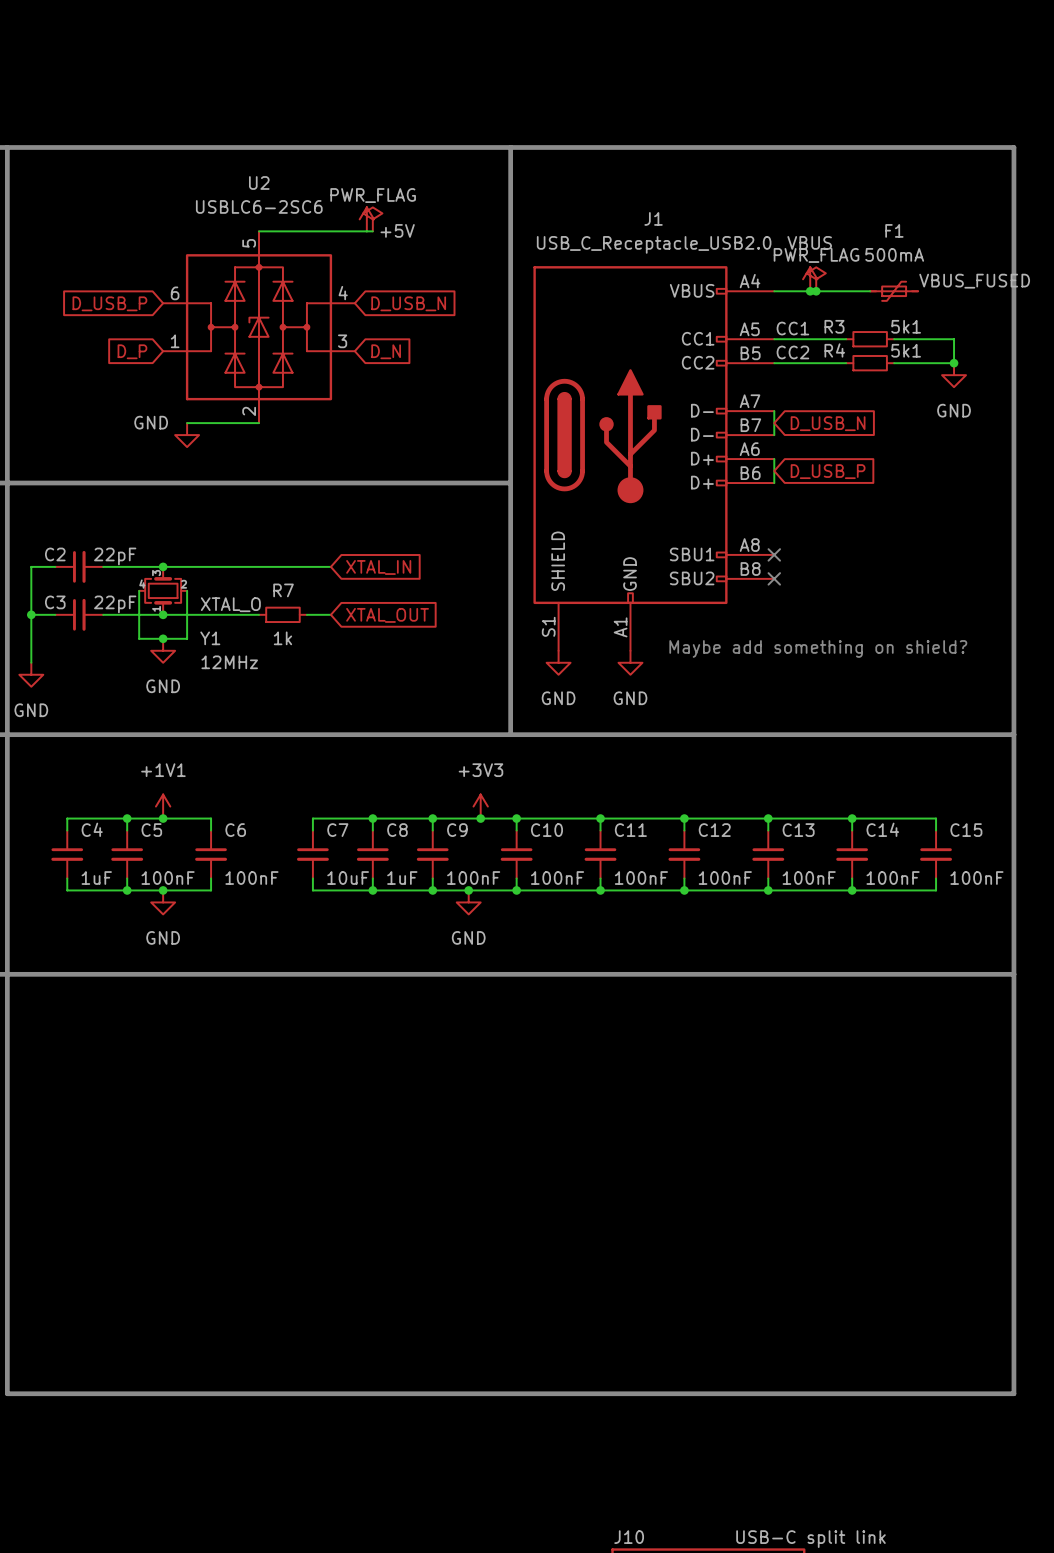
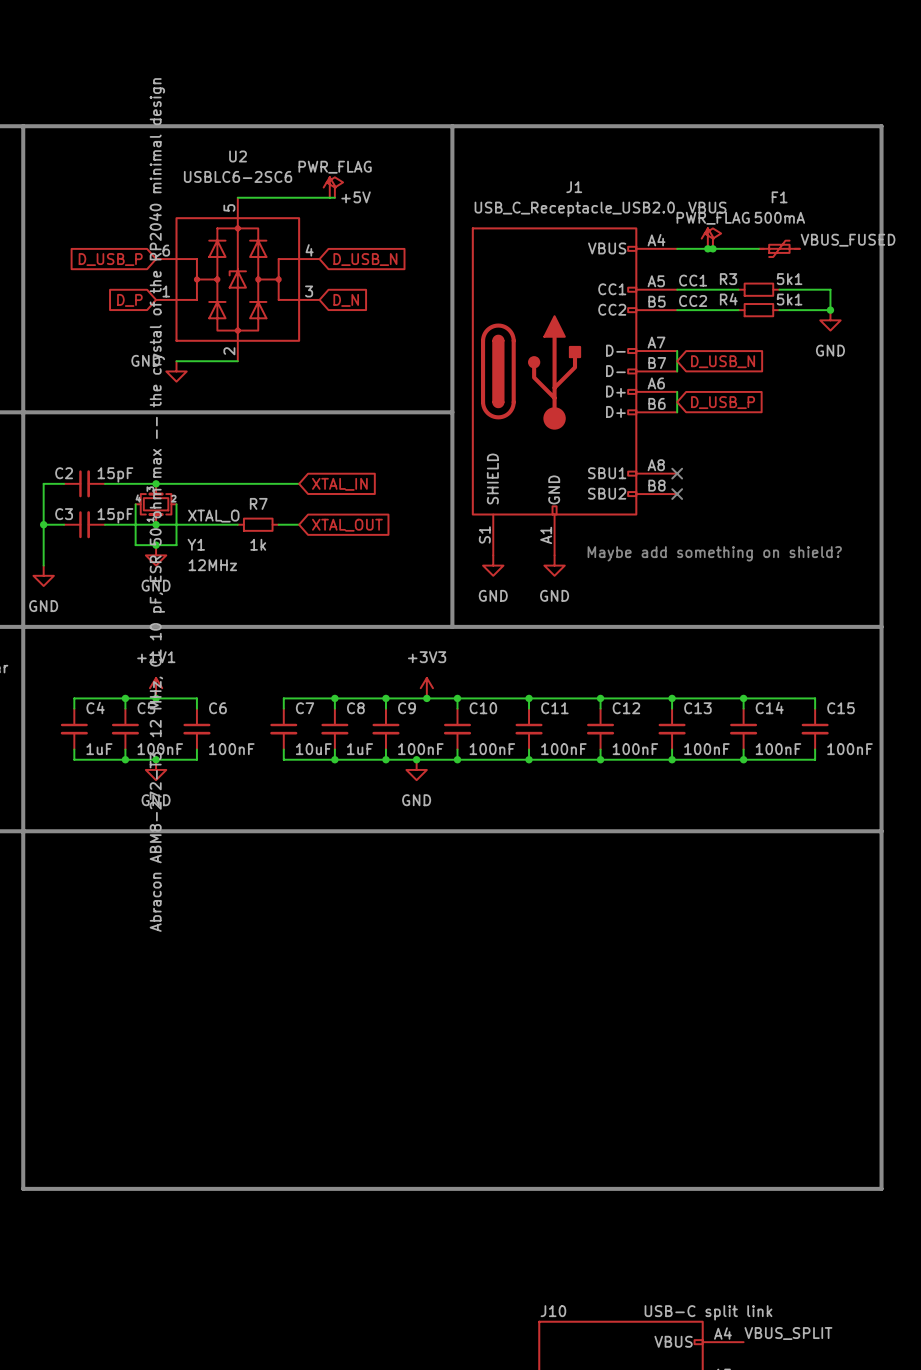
C2 value: 22pF (115, 556) -> 15pF (115, 474)
Y1 text: none -> Abracon ABM8-272-T3, 12 MHz, CL 10 pF, ESR 50 ohm max -- the crystal of the RP2040 minimal design (157, 505)
C3 value: 22pF (115, 604) -> 15pF (115, 515)

